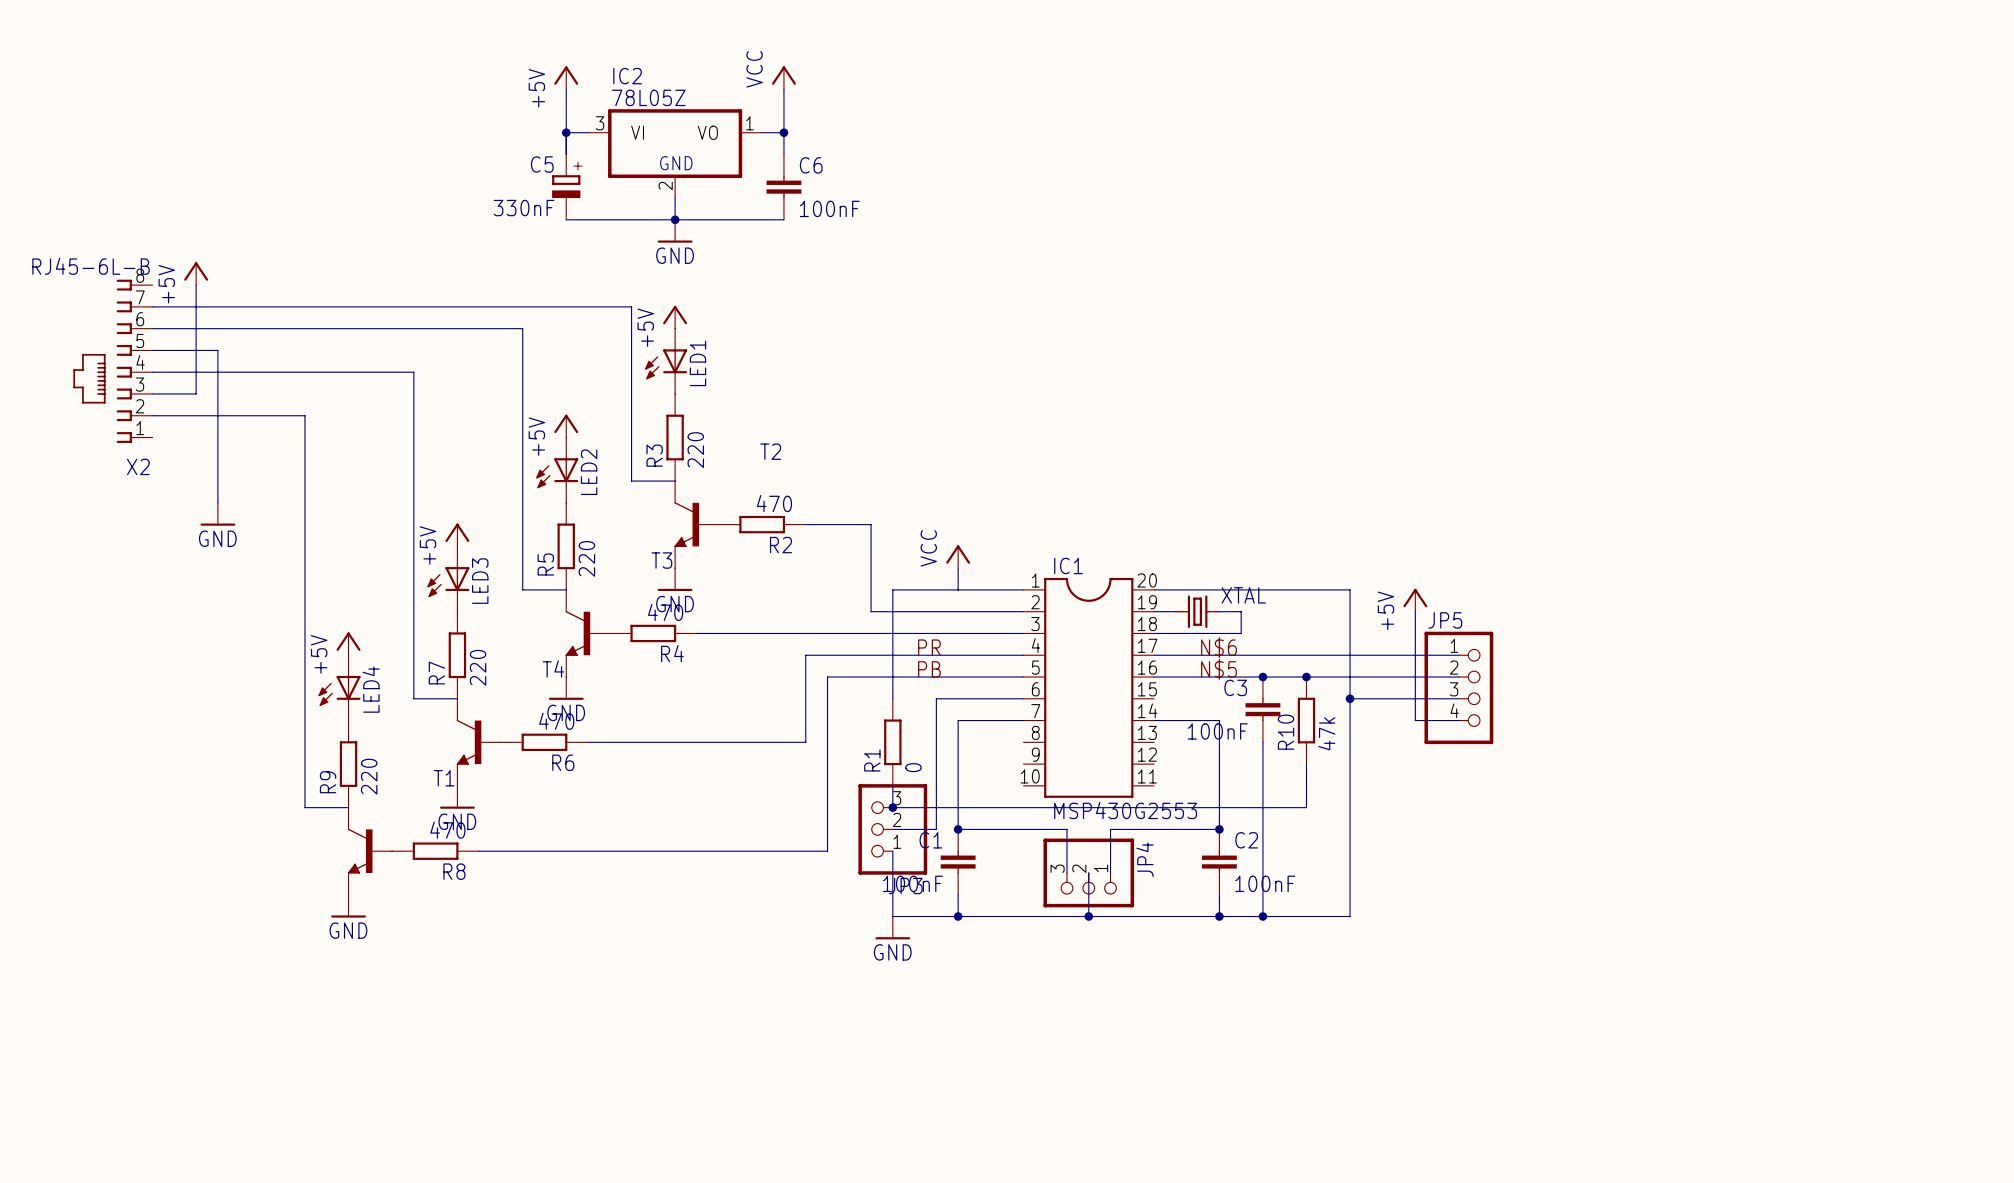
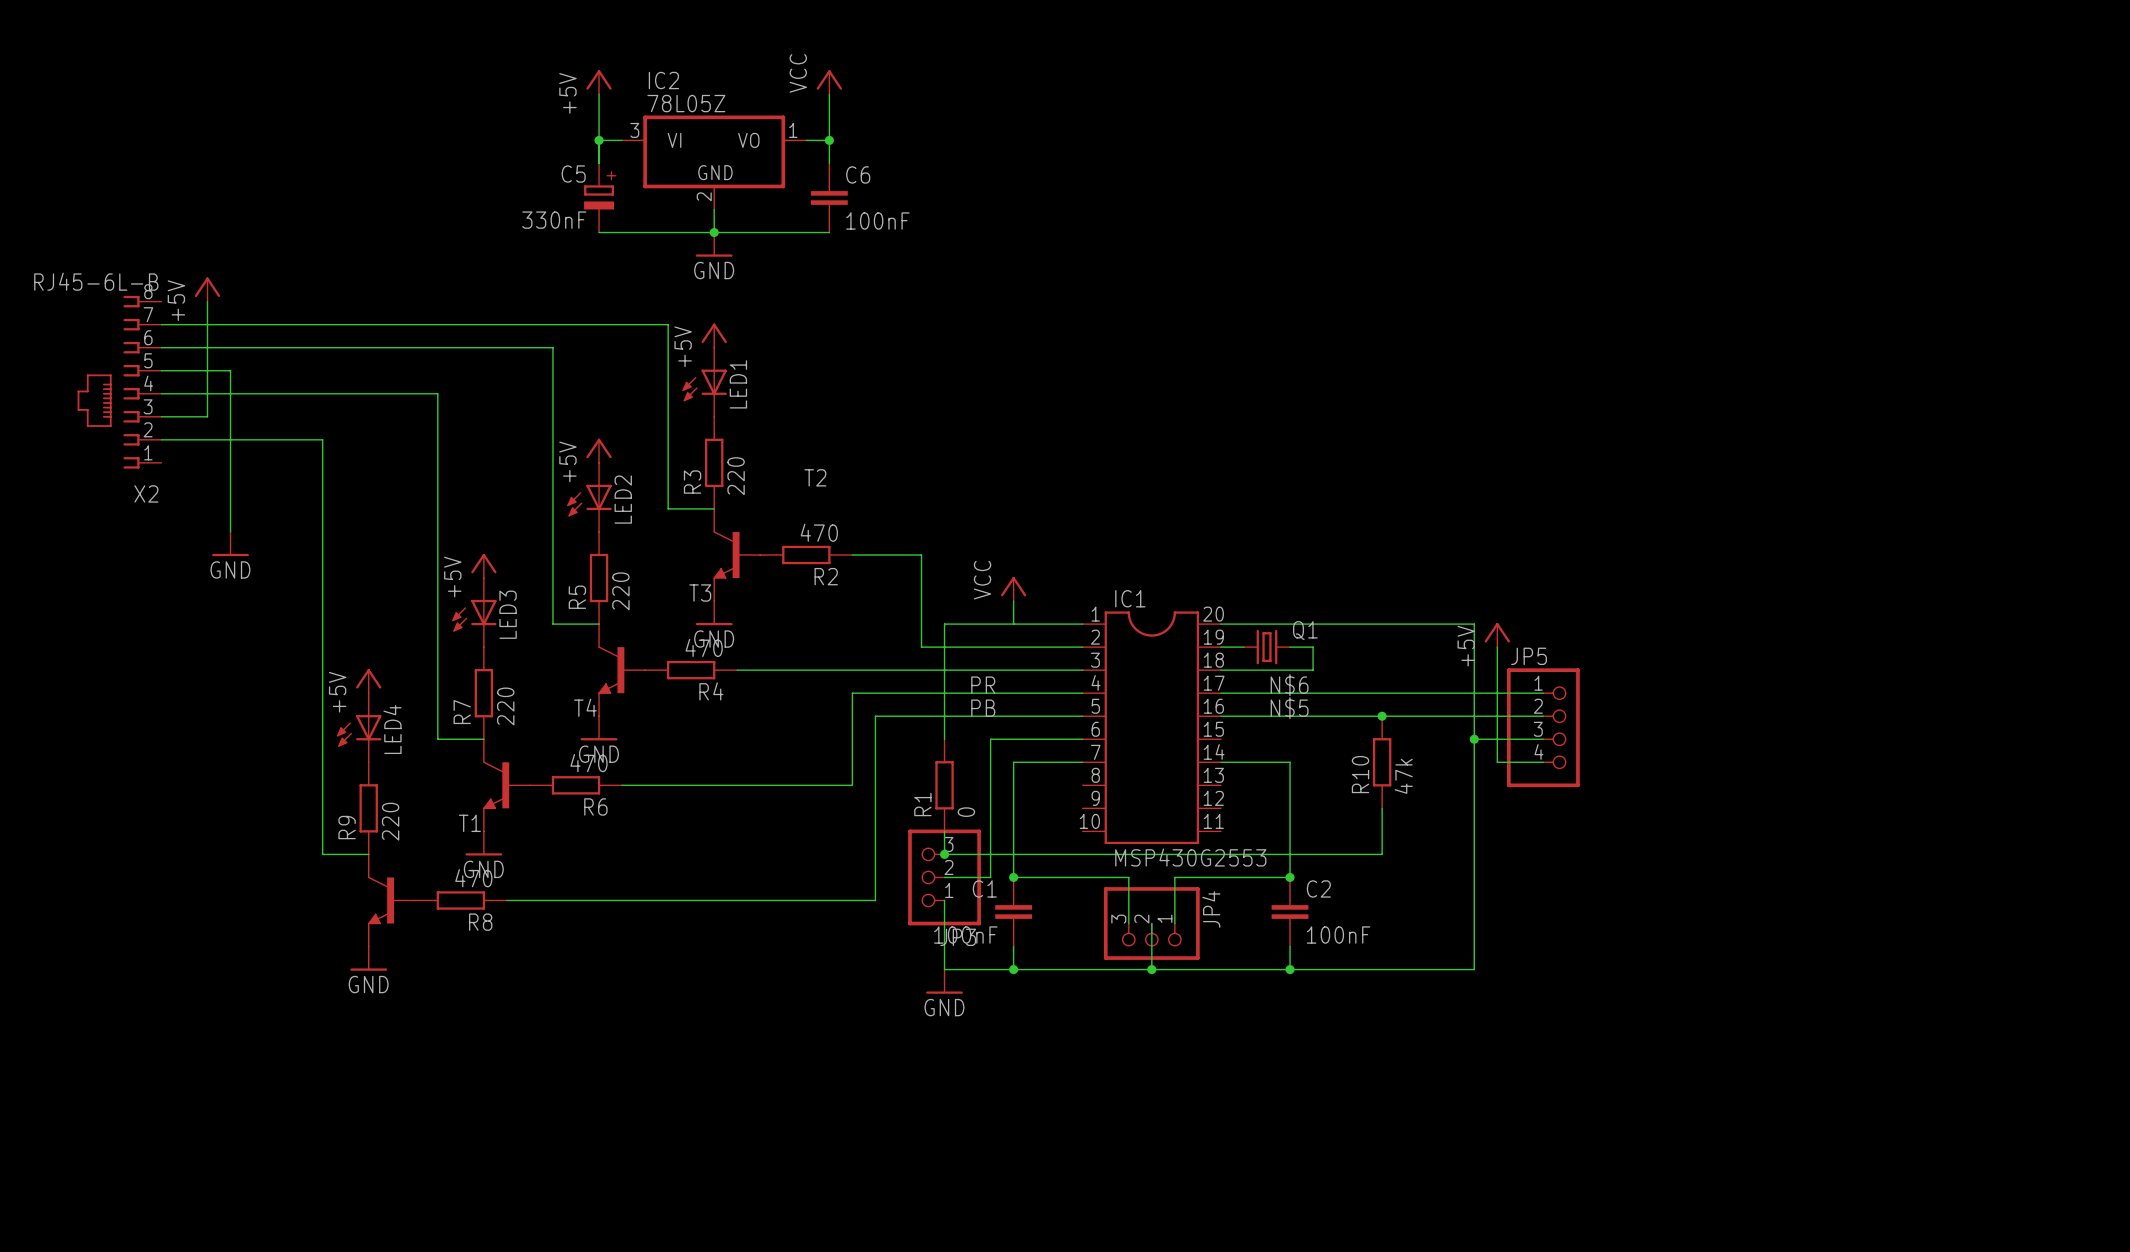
wire: (1350, 589) (1350, 916) -> (1428, 624) (1474, 624) (1474, 969) (1428, 969)
XTAL name: XTAL (1243, 595) -> Q1 (1305, 630)
junction: (1262, 677) -> none
wire: (1350, 698) (1393, 698) -> none
junction position: (1350, 698) -> (1474, 739)
C3: 100nF (1262, 709) -> none
wire: (1262, 742) (1262, 916) -> none
junction: (1262, 916) -> none

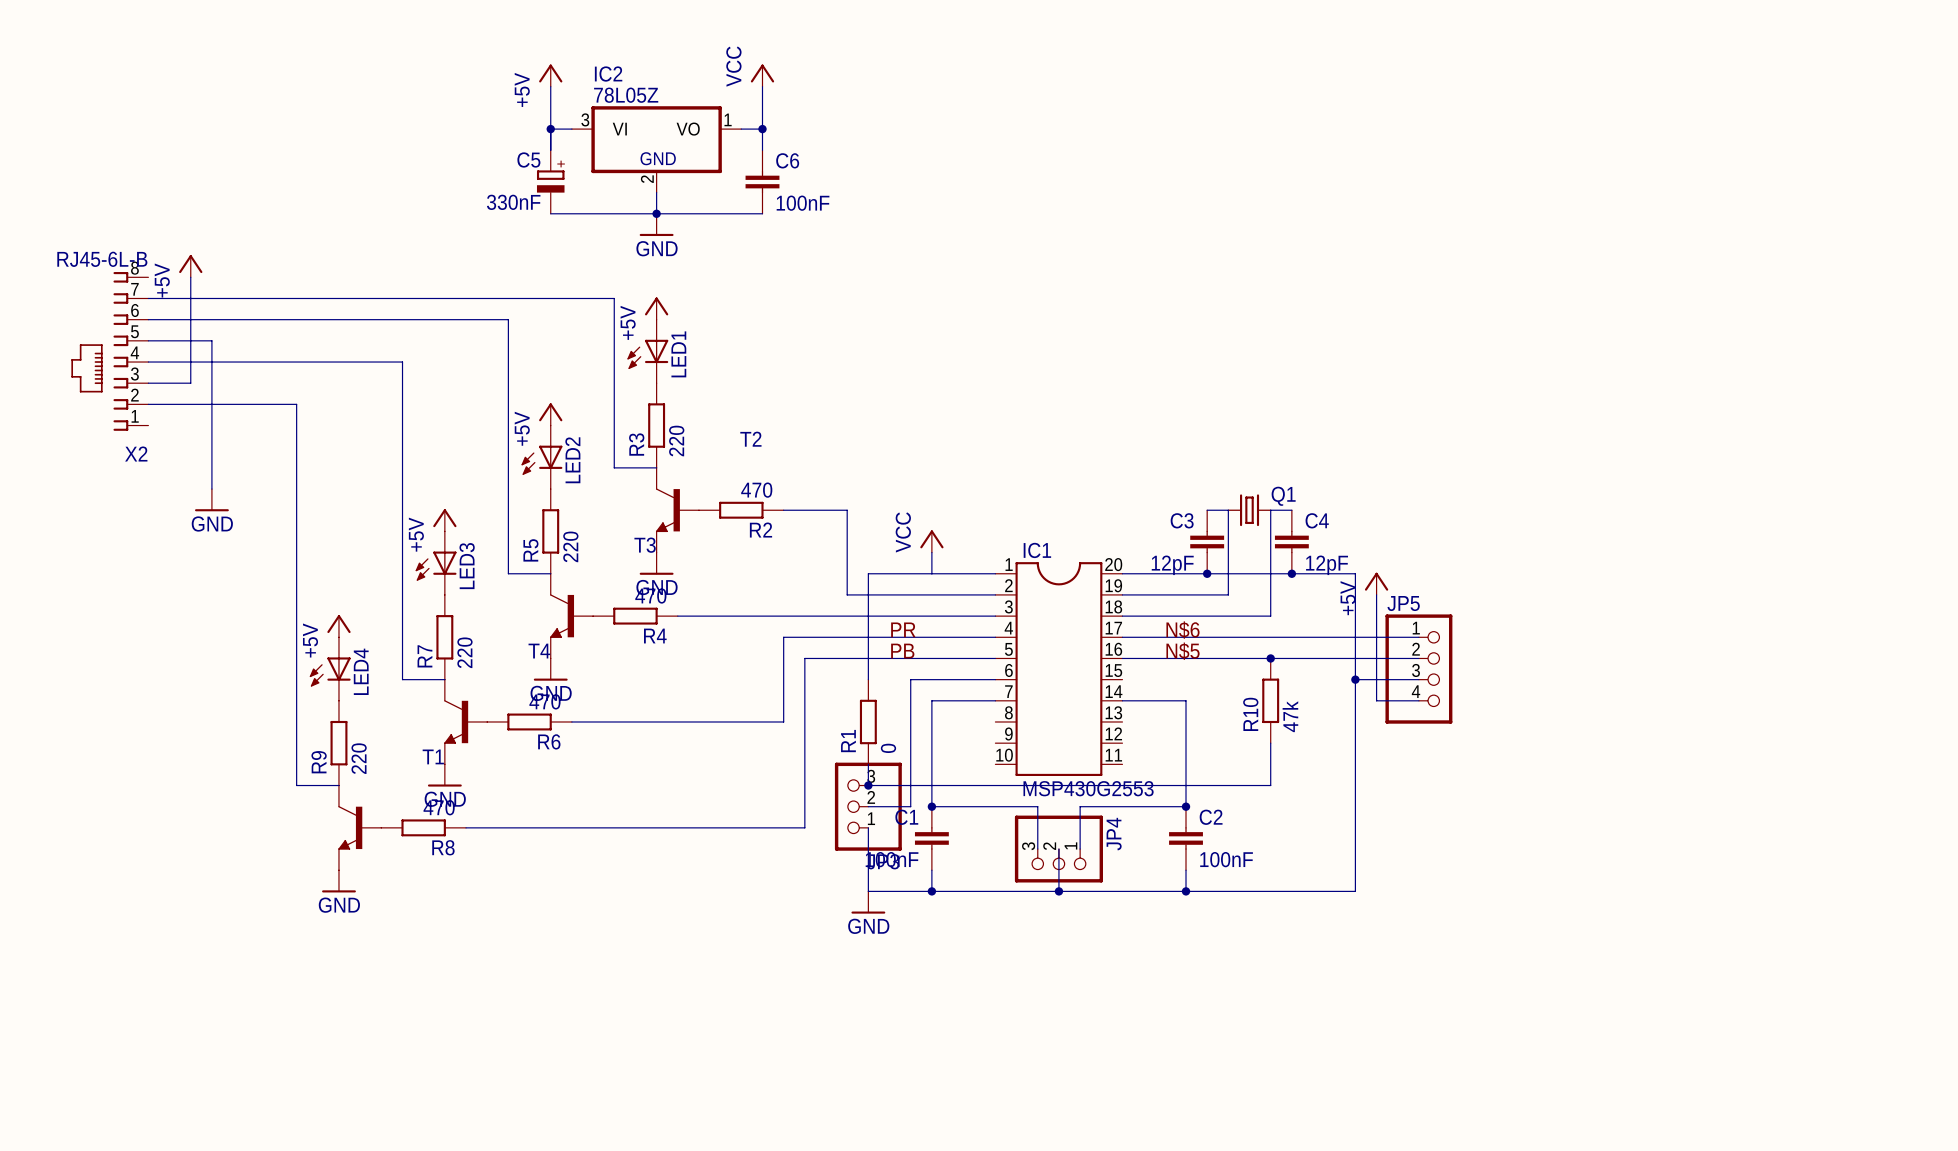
wire: none -> (1291, 510) (1270, 510) (1270, 616) (1207, 616)
C3: none -> 12pF (1207, 542)
C4: none -> 12pF (1291, 542)
junction: none -> (1207, 573)
junction: none -> (1291, 573)
Q1 position: (1266, 647) -> (1249, 510)
wire: (1313, 647) (1313, 670) -> (1207, 594) (1228, 594) (1228, 510) (1207, 510)

